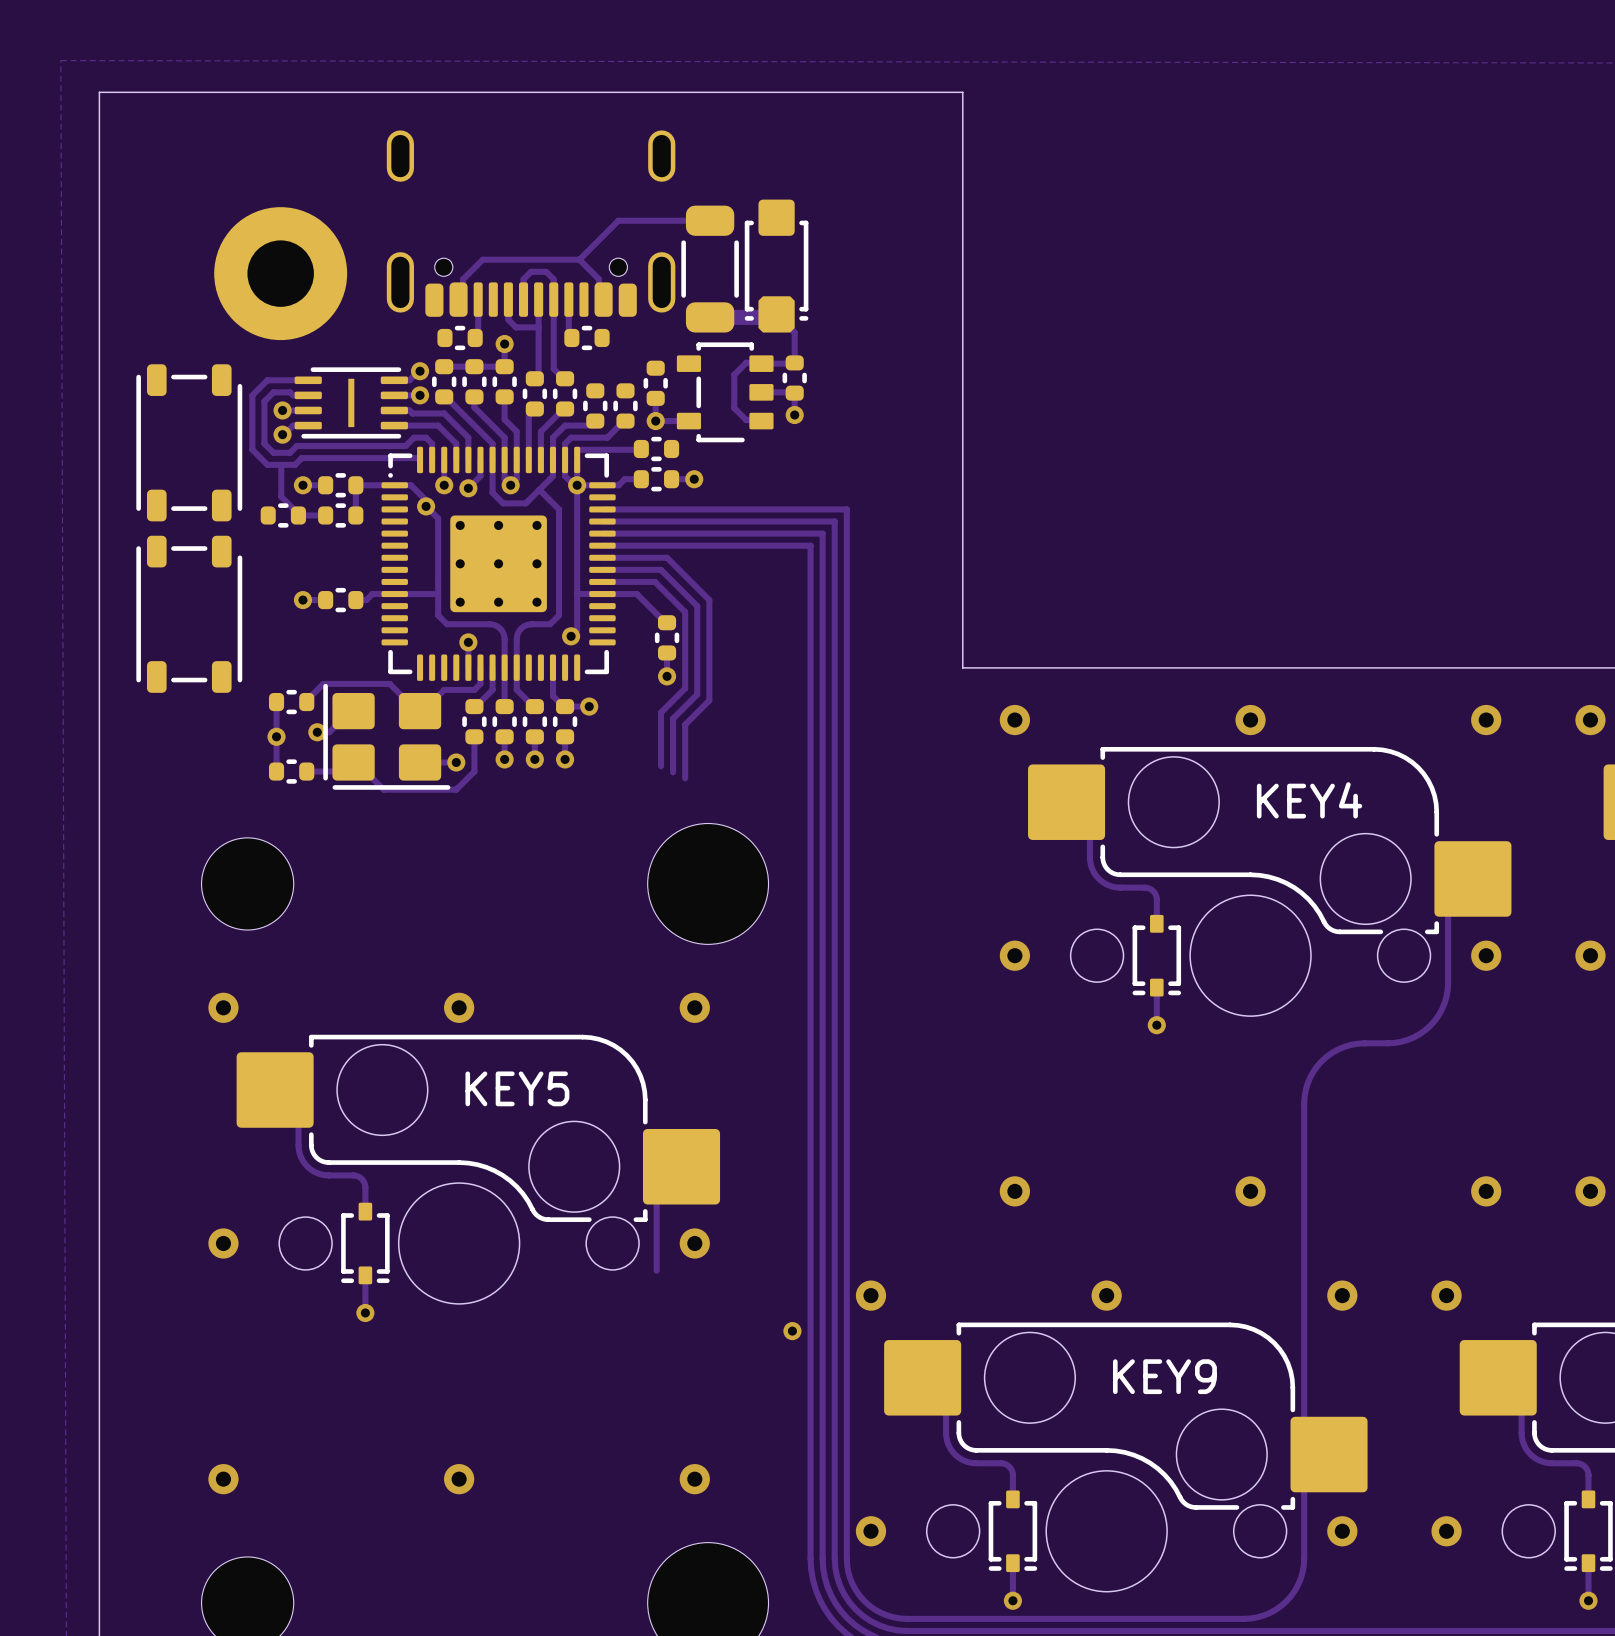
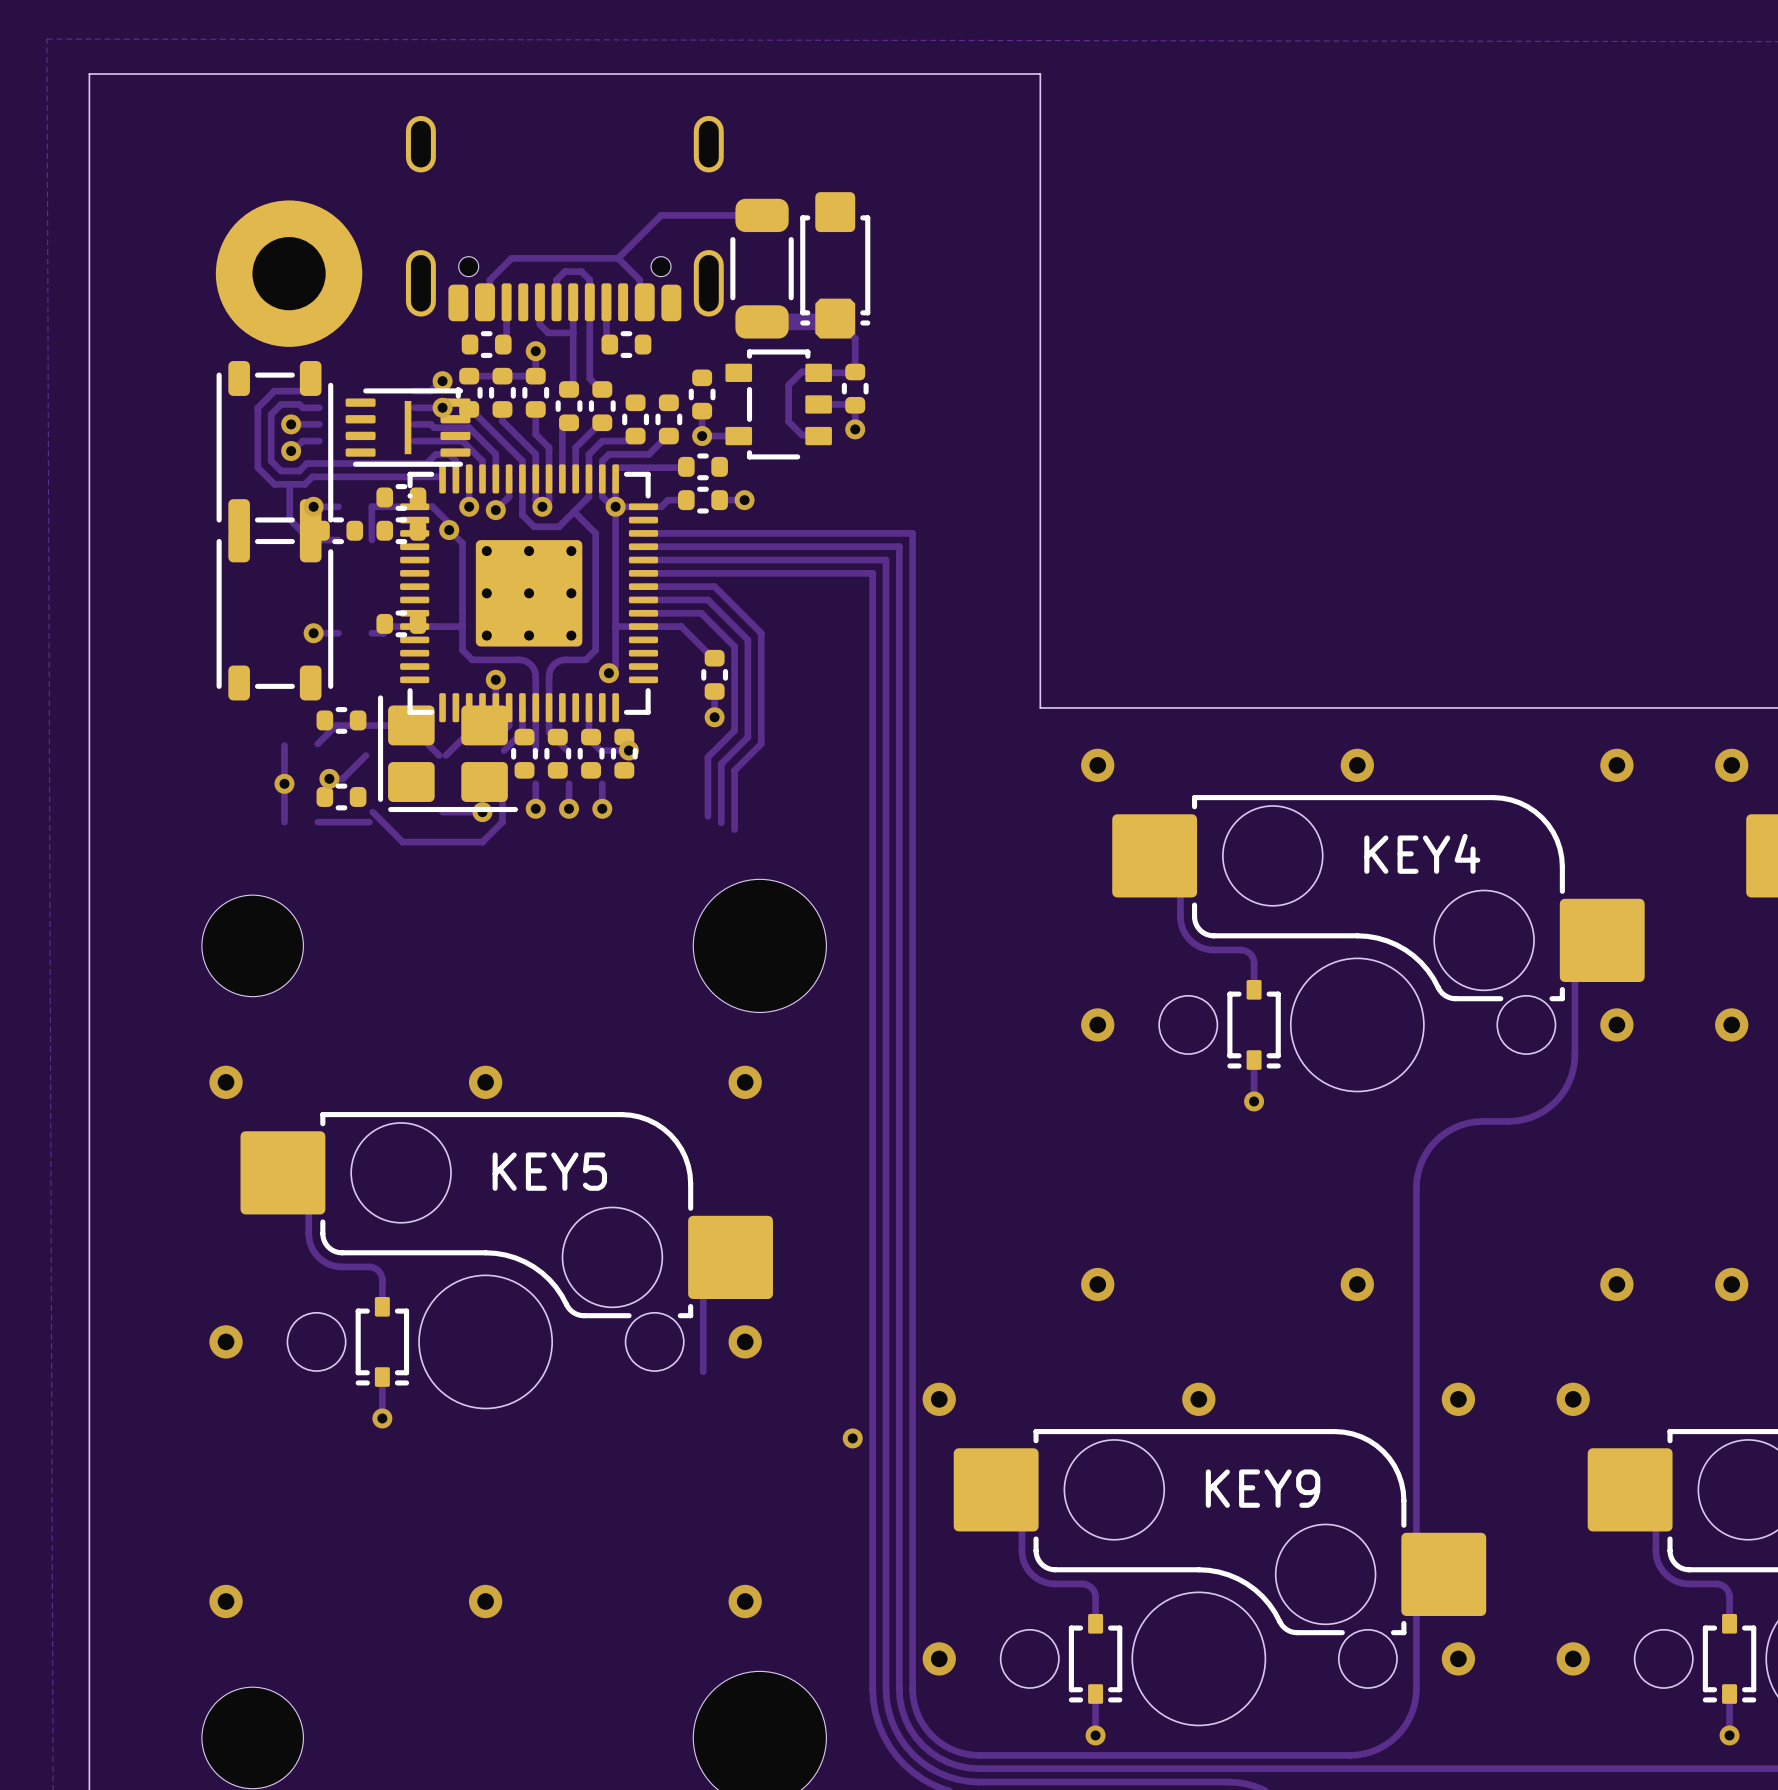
part position: (351, 402) -> (408, 427)
part position: (189, 442) -> (274, 447)
part: none -> (401, 497)
part: (340, 485) -> none
part: none -> (338, 530)
part: none -> (401, 530)
part: (283, 515) -> none
part: (340, 515) -> none
part: none -> (274, 613)
part: none -> (401, 623)
part: (340, 600) -> none
part: (189, 614) -> none
part: none -> (341, 720)
part: (291, 702) -> none
part: none -> (524, 753)
part: none -> (557, 753)
part: none -> (591, 753)
part: none -> (624, 753)
part: (474, 721) -> none
part: (504, 721) -> none
part: (534, 721) -> none
part: (565, 721) -> none
part position: (386, 736) -> (447, 753)
part: none -> (341, 796)
part: (291, 771) -> none

